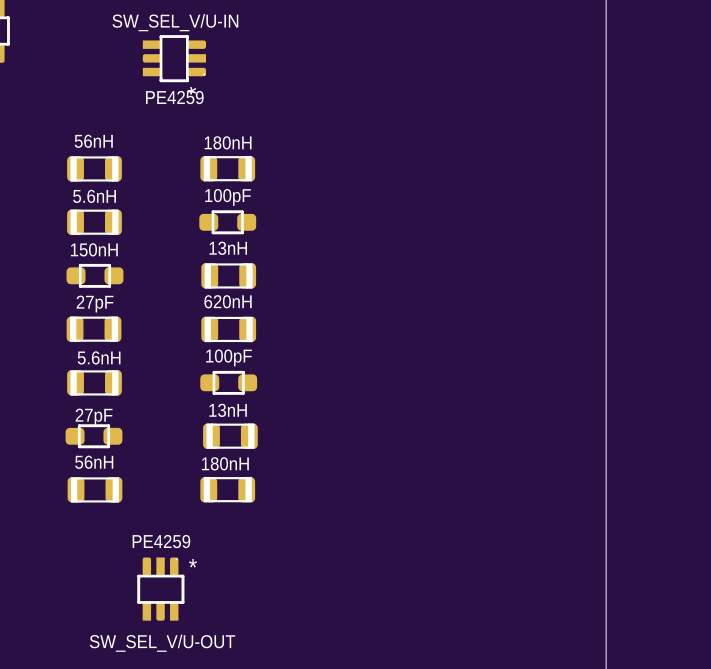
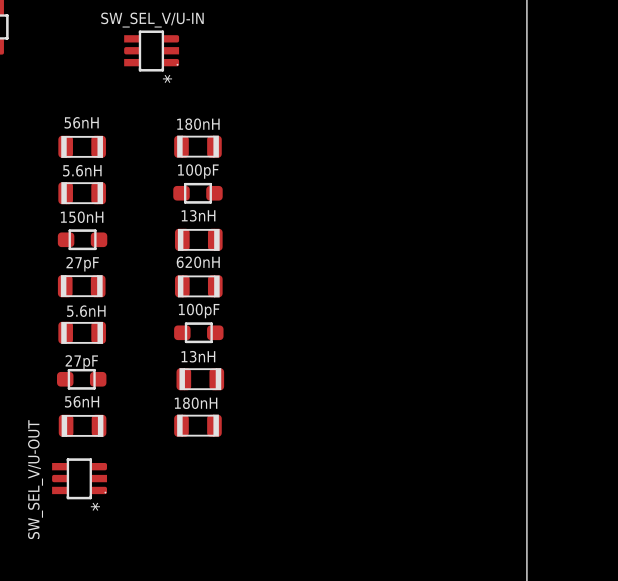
SW_SEL_V/U-IN value: PE4259 (174, 97) -> none
SW_SEL_V/U-OUT: none -> (79, 478)
SW_SEL_V/U-OUT: PE4259 (160, 589) -> none

